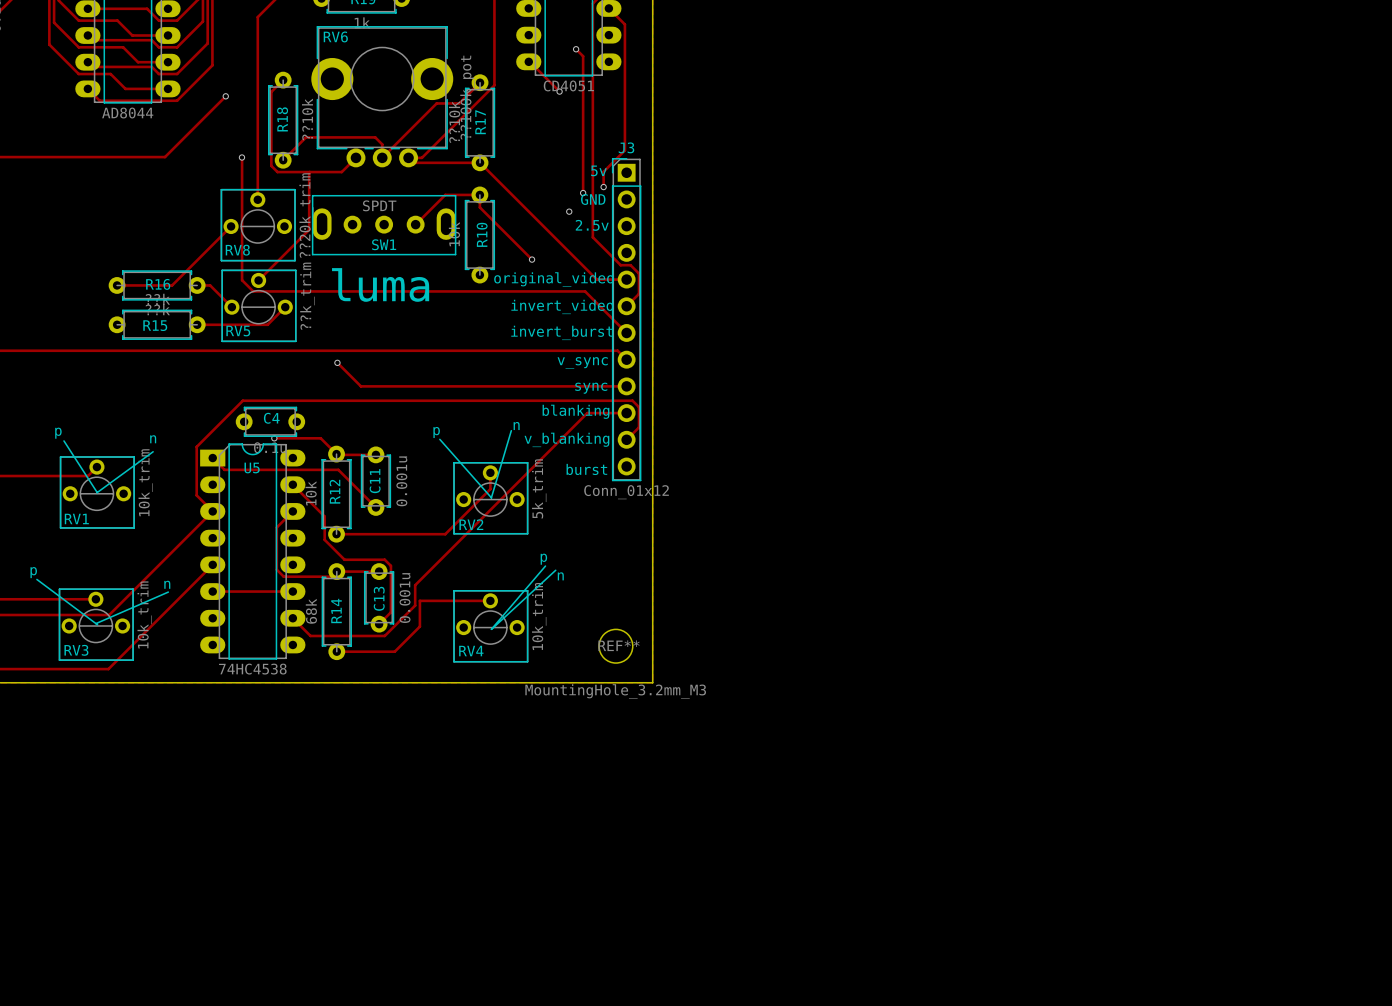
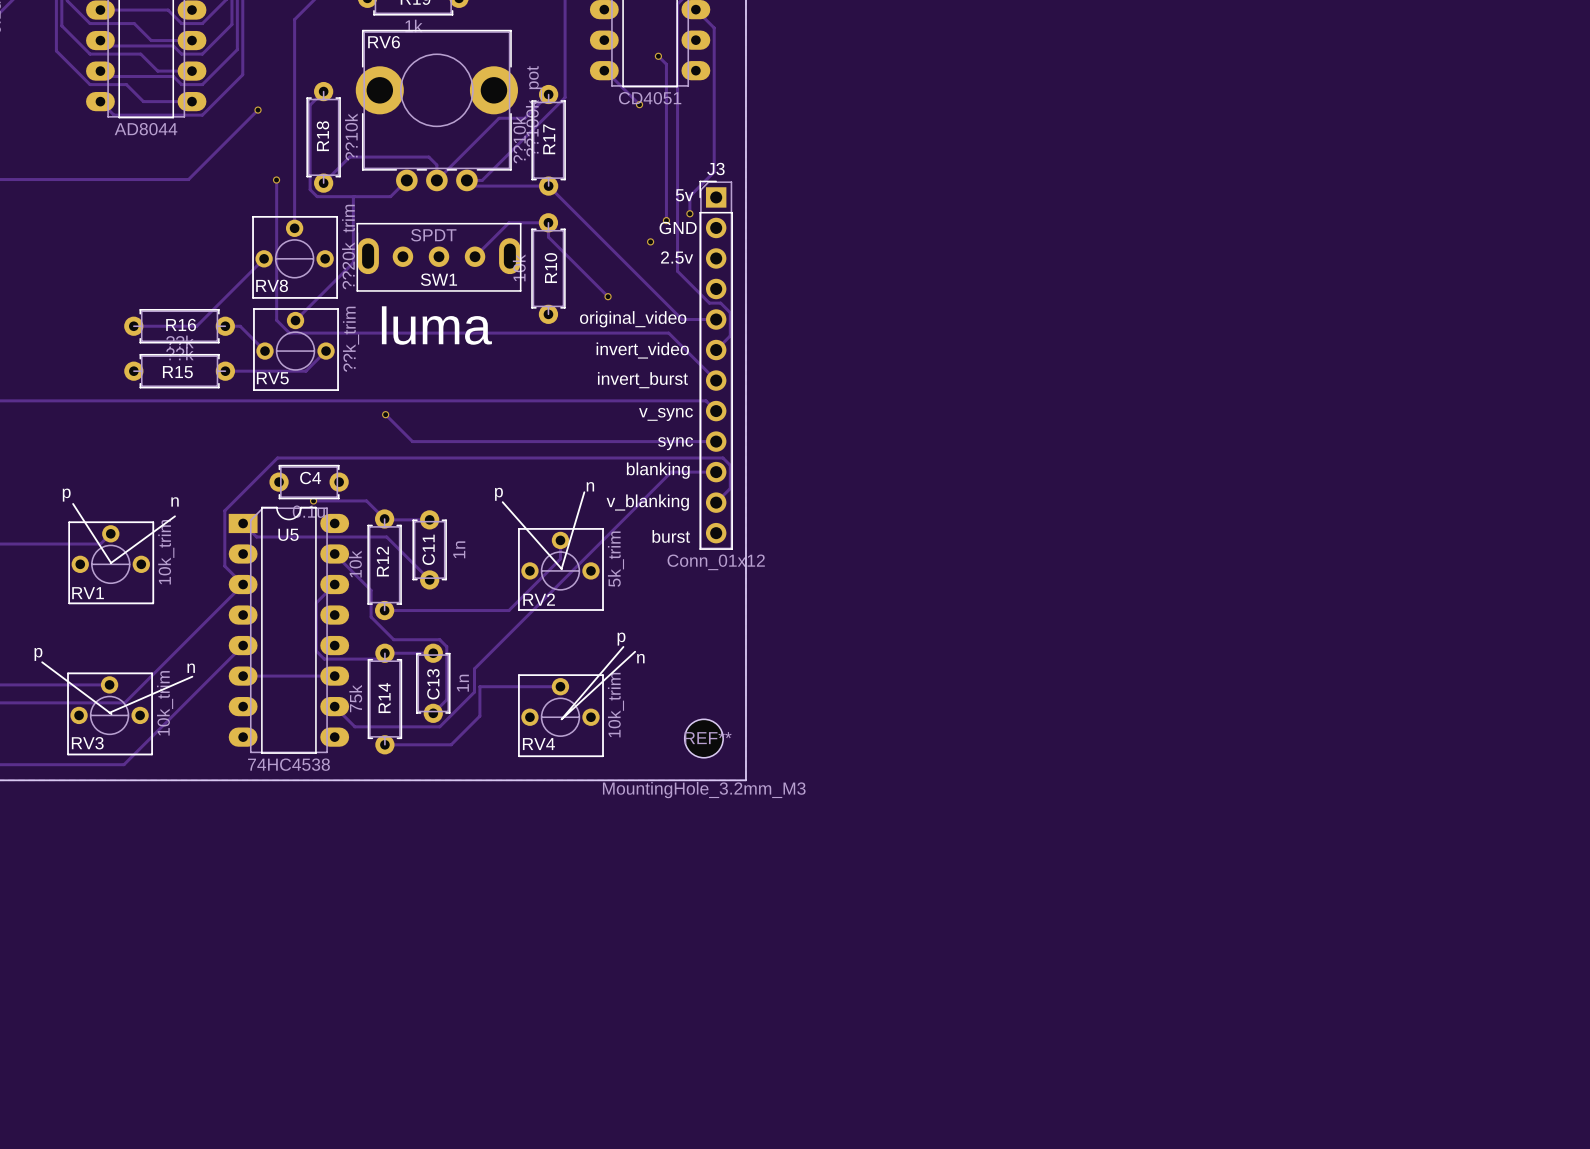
C11 value: 0.001u (401, 481) -> 1n (459, 549)
C13 value: 0.001u (405, 598) -> 1n (462, 683)
R14 value: 68k (311, 611) -> 75k (355, 698)

